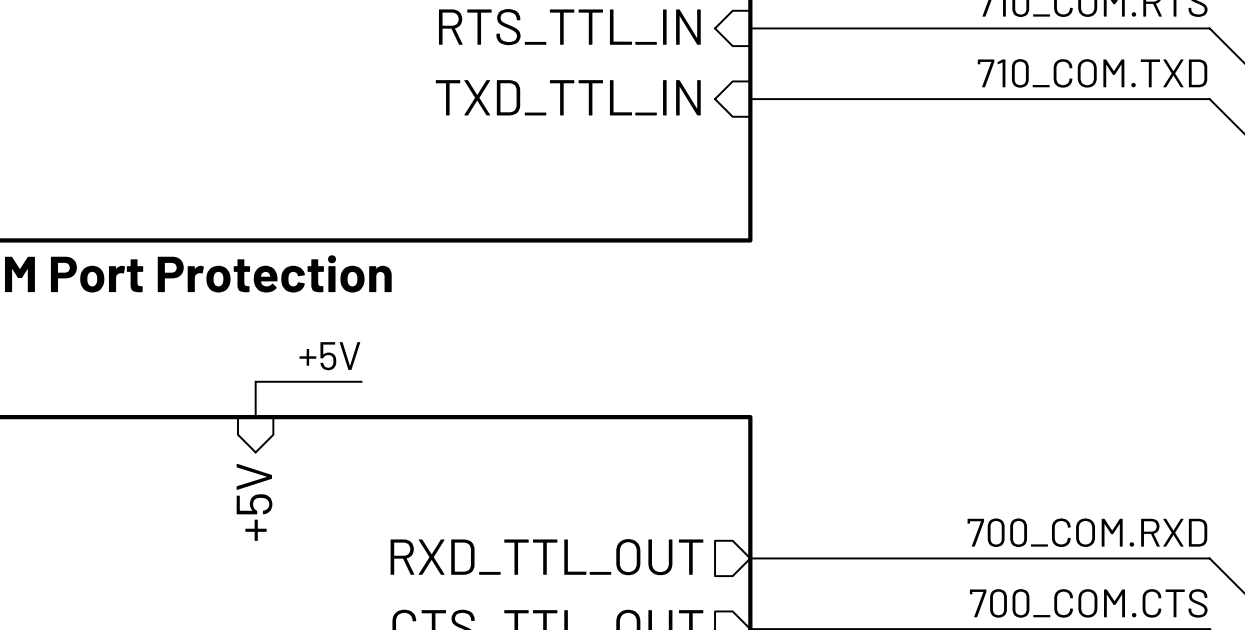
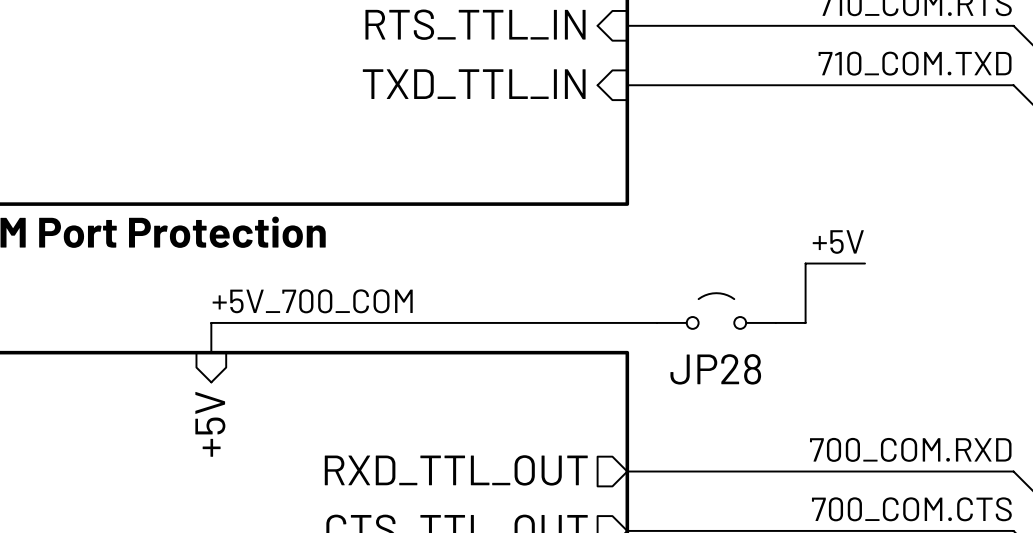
wire: none -> (865, 263) (805, 263) (805, 322) (775, 322)
label position: +5V (329, 356) -> +5V (838, 242)
label: none -> +5V_700_COM (312, 301)
JP28: none -> (716, 311)
wire: none -> (300, 322) (657, 322)

